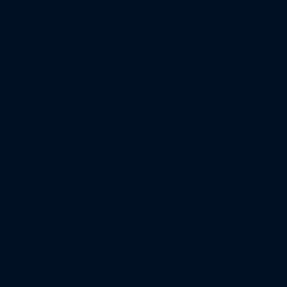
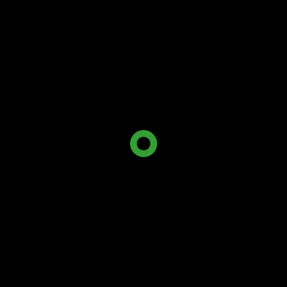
via: none -> (143, 143)

